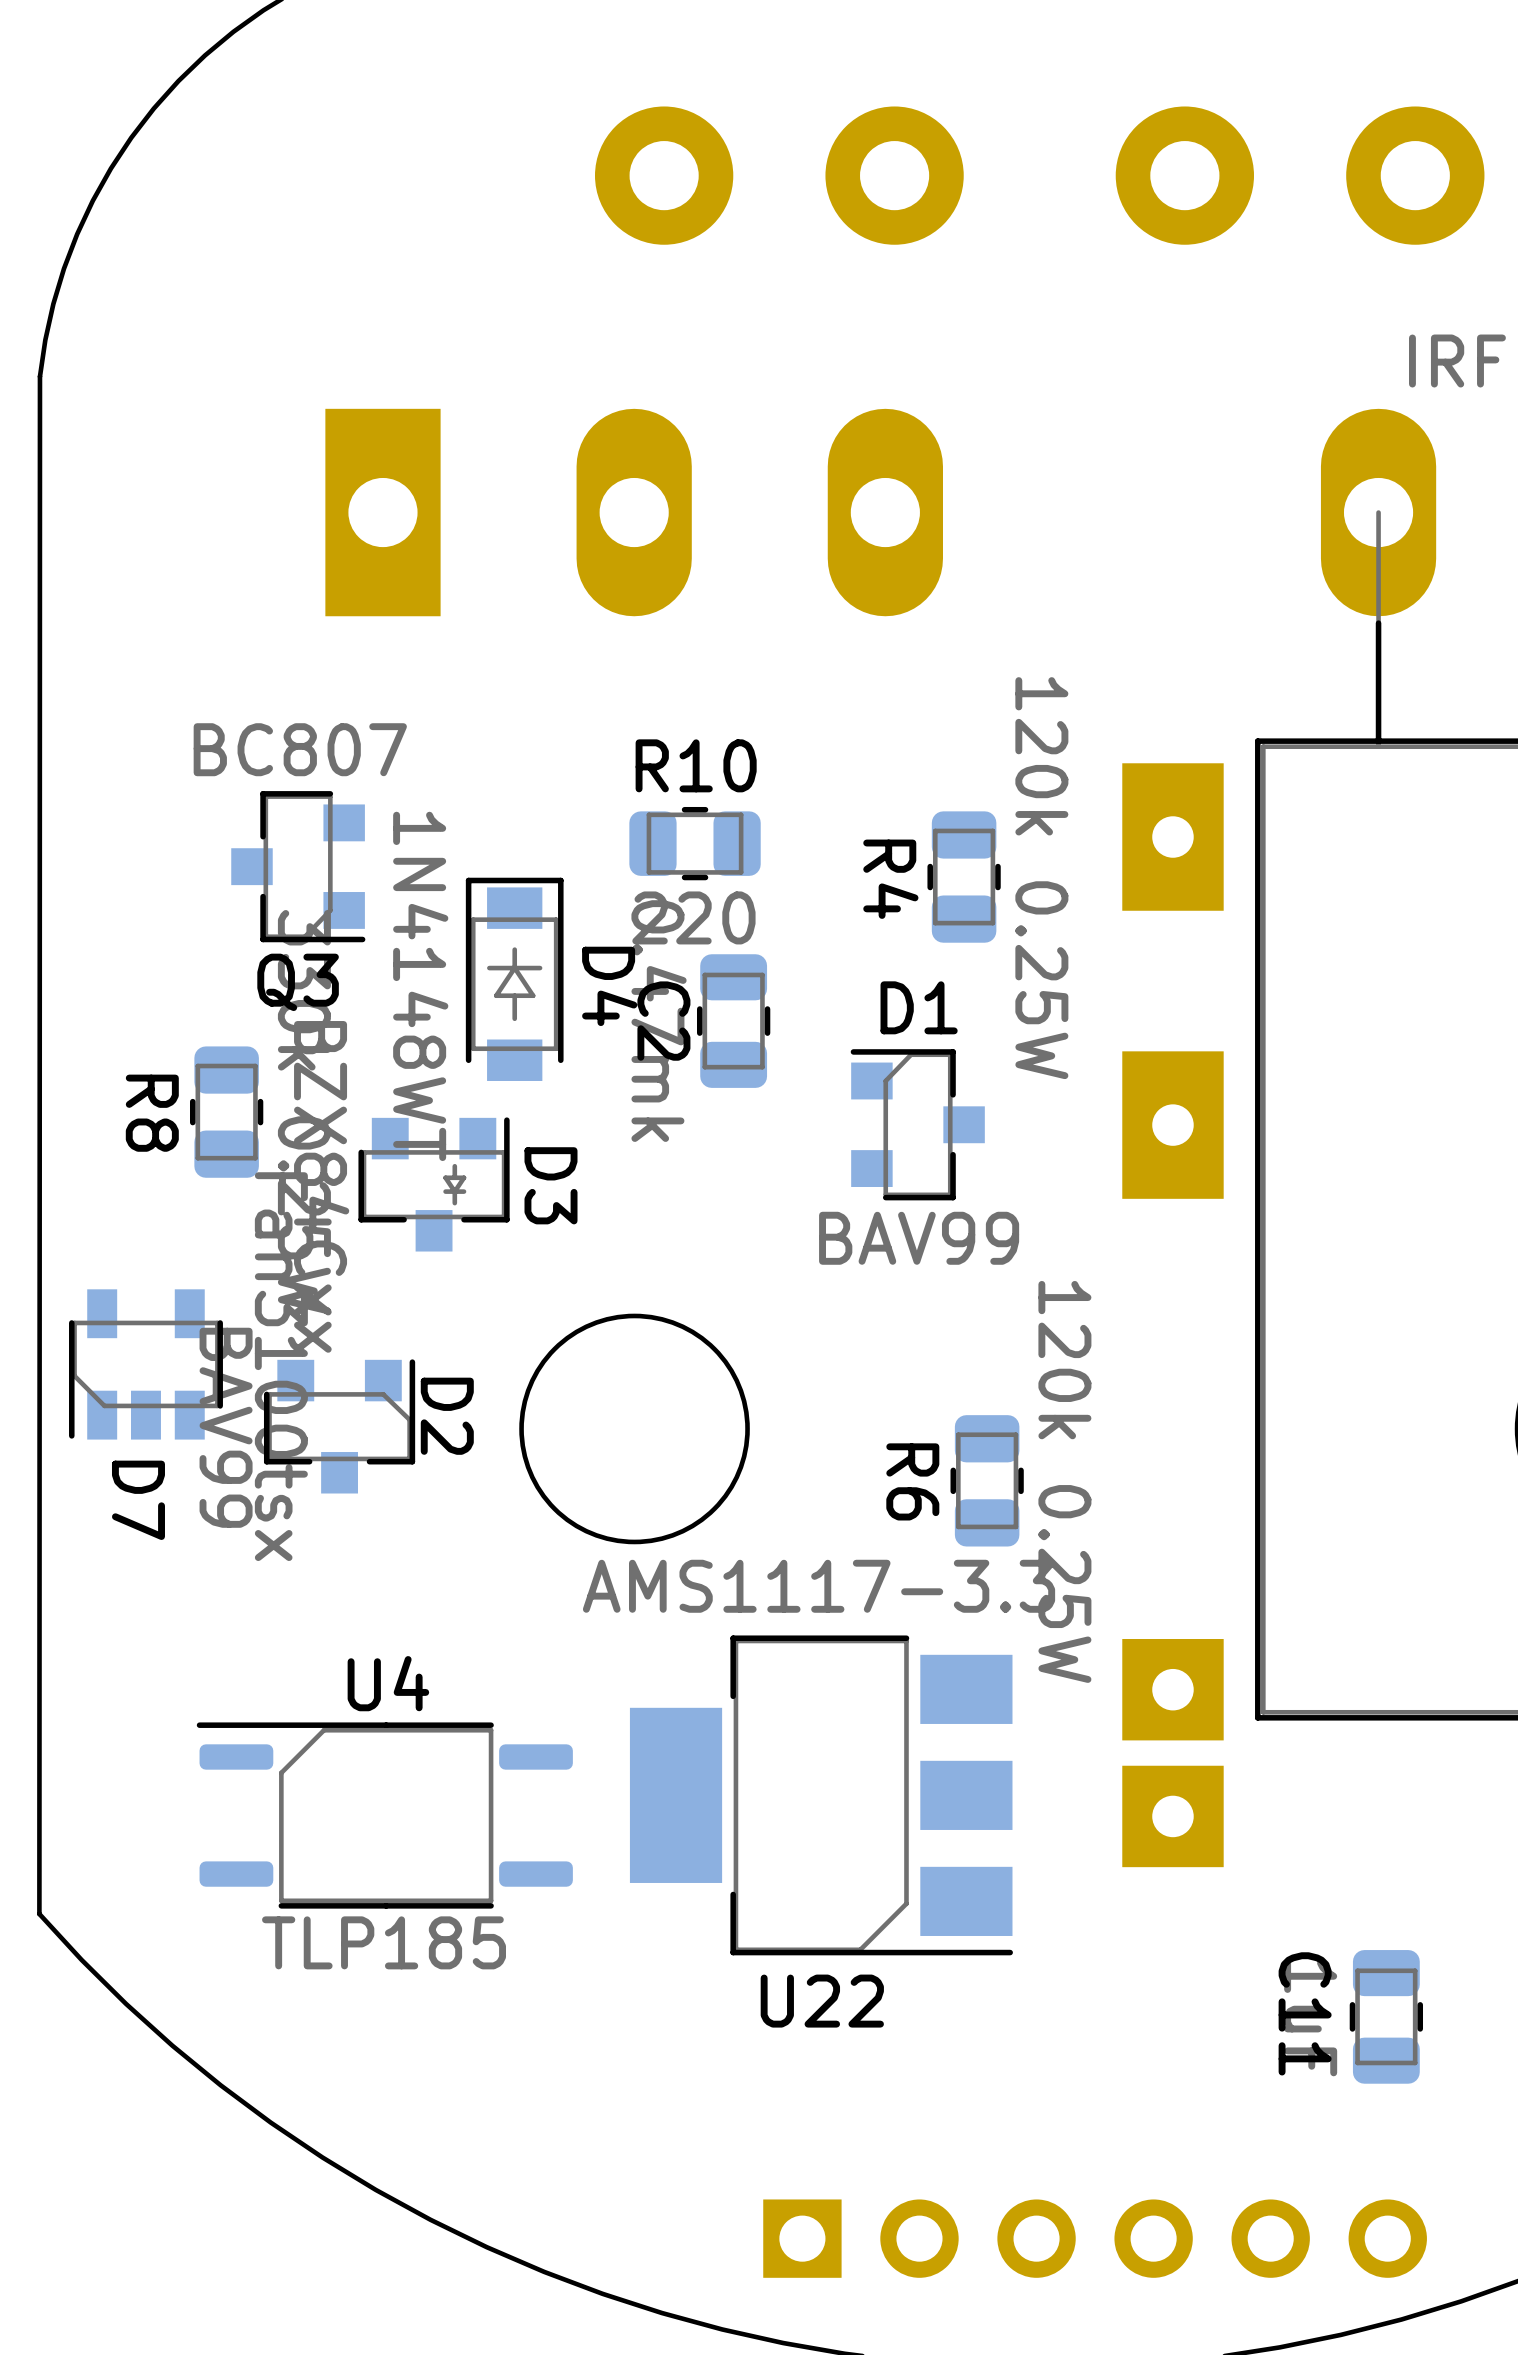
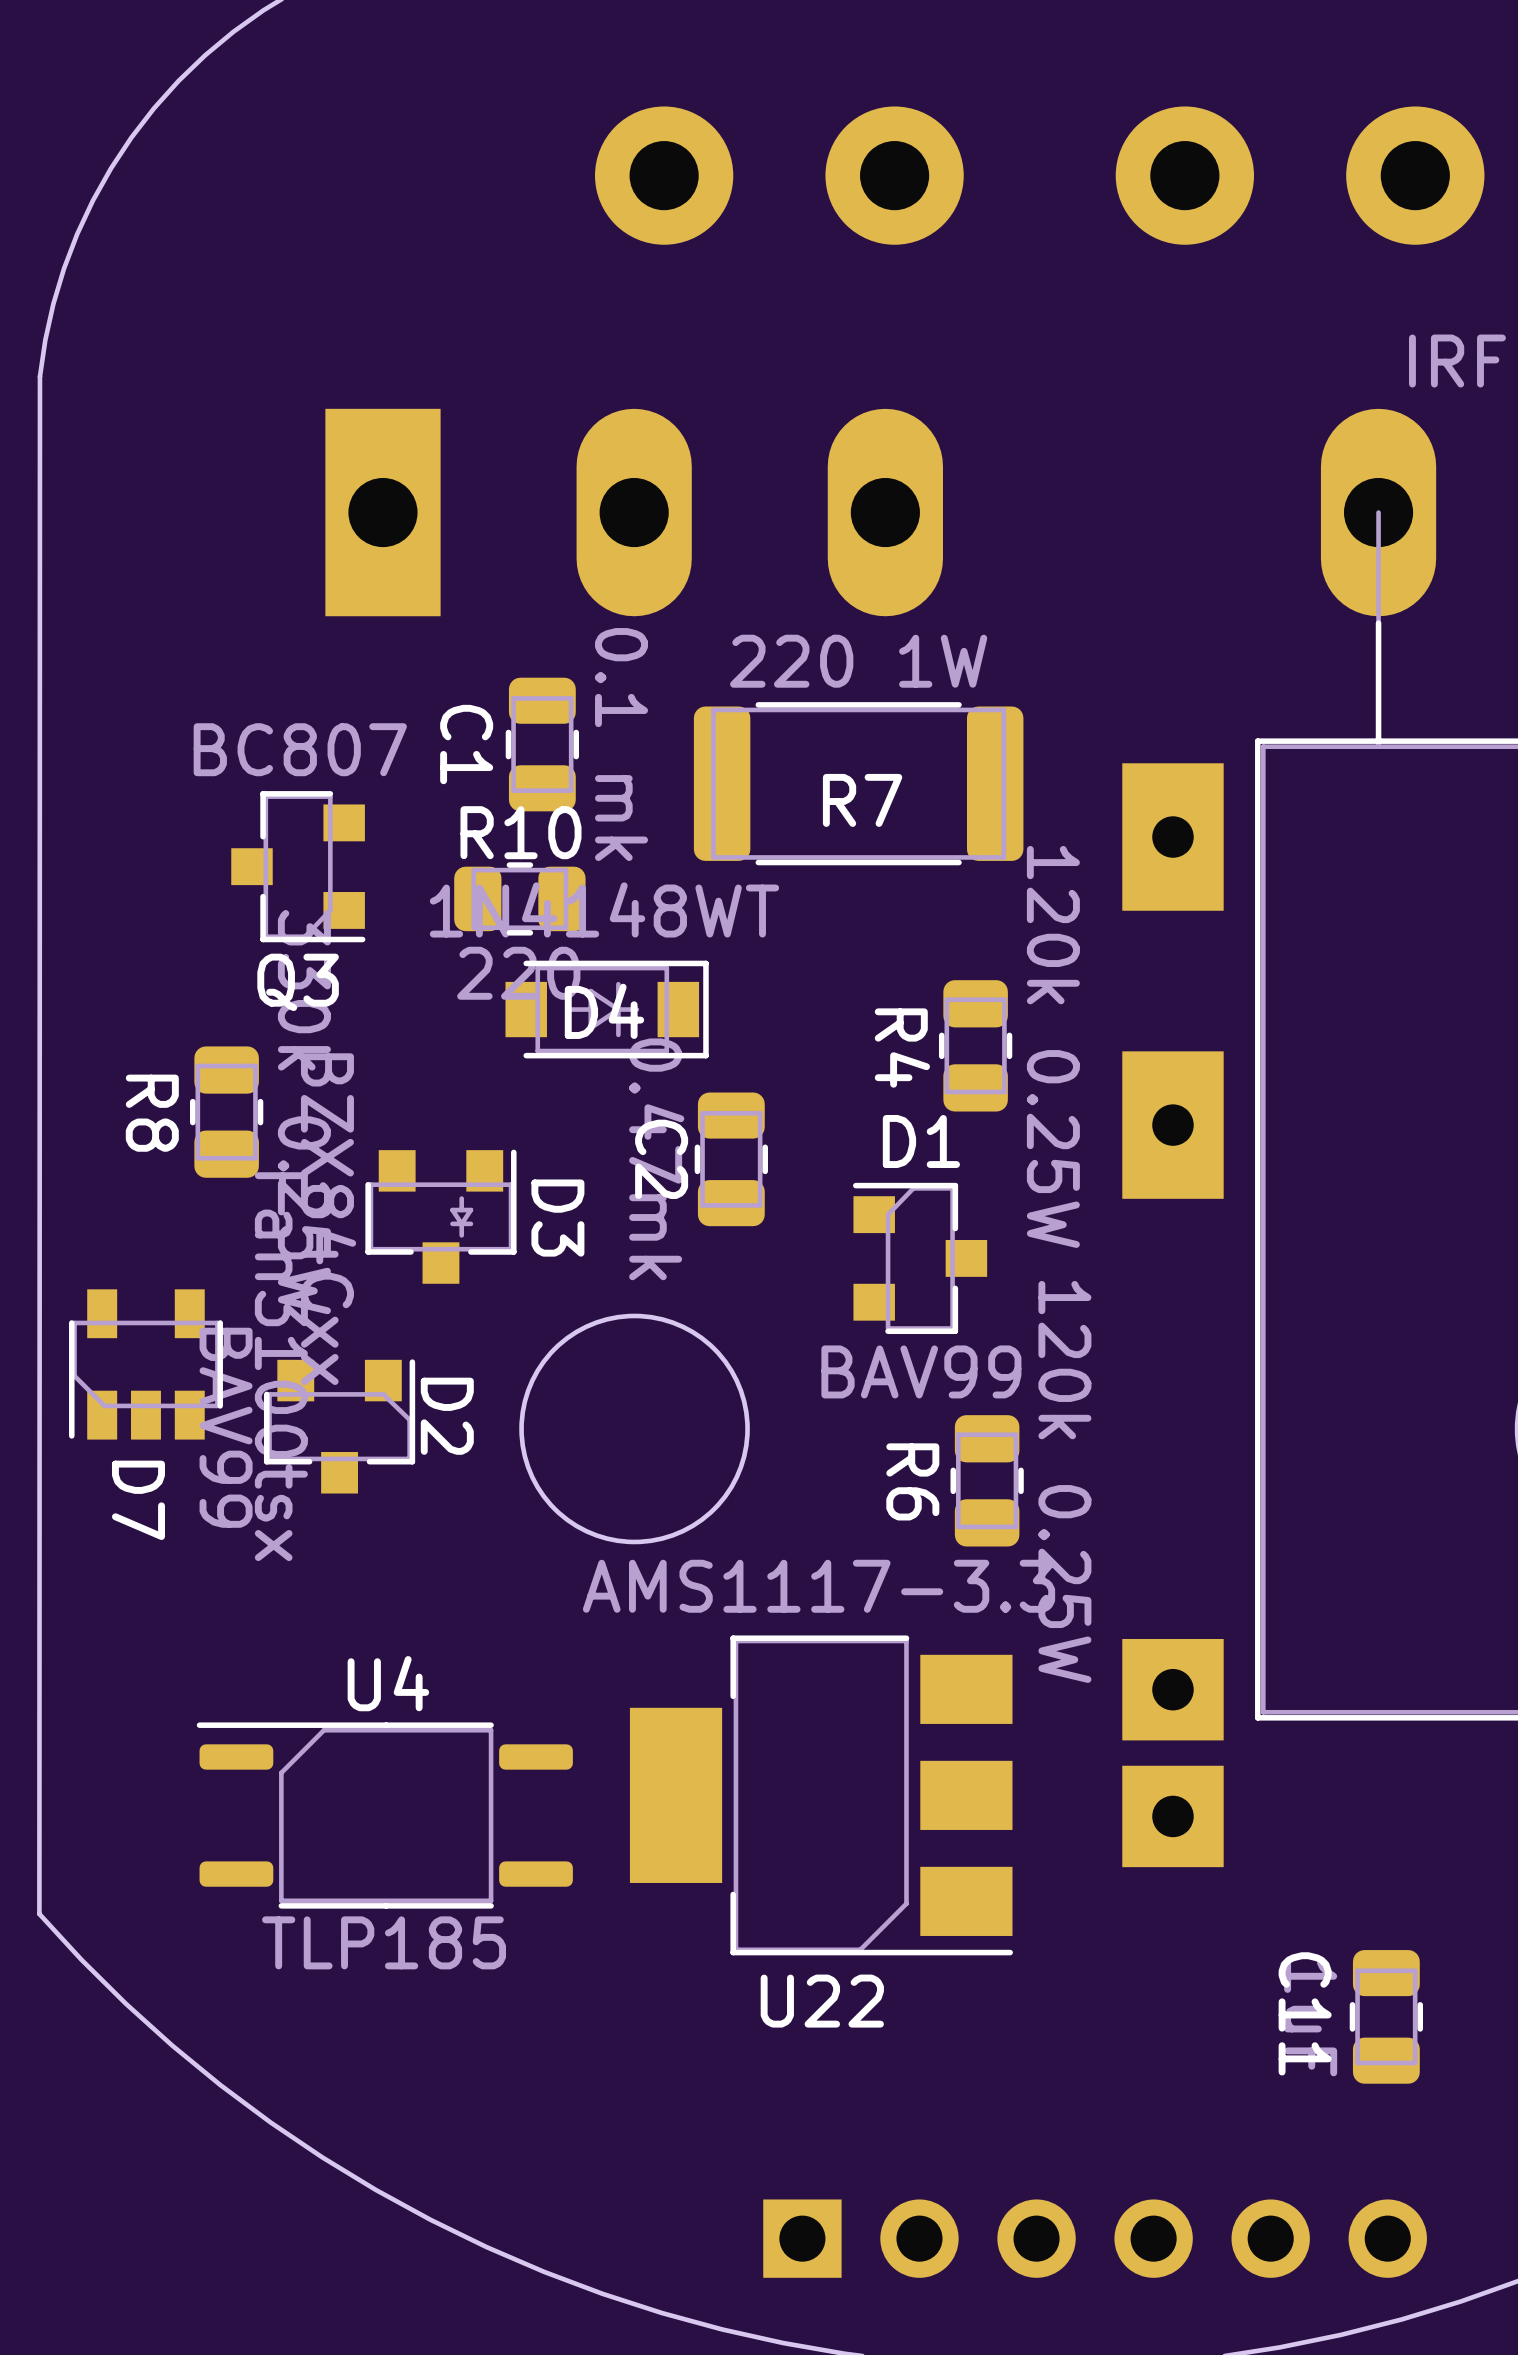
C1: none -> 0.1 mk (542, 744)
R10 name position: R10 (696, 765) -> R10 (520, 832)
R7: none -> 220 1W (858, 783)
R10 position: (695, 843) -> (519, 898)
R4 position: (964, 877) -> (975, 1045)
D4 rotation: 0° (514, 979) -> 90° clockwise (607, 1009)
C2 position: (733, 1021) -> (731, 1159)
D1 position: (917, 1124) -> (920, 1258)
D3 position: (434, 1184) -> (440, 1216)

